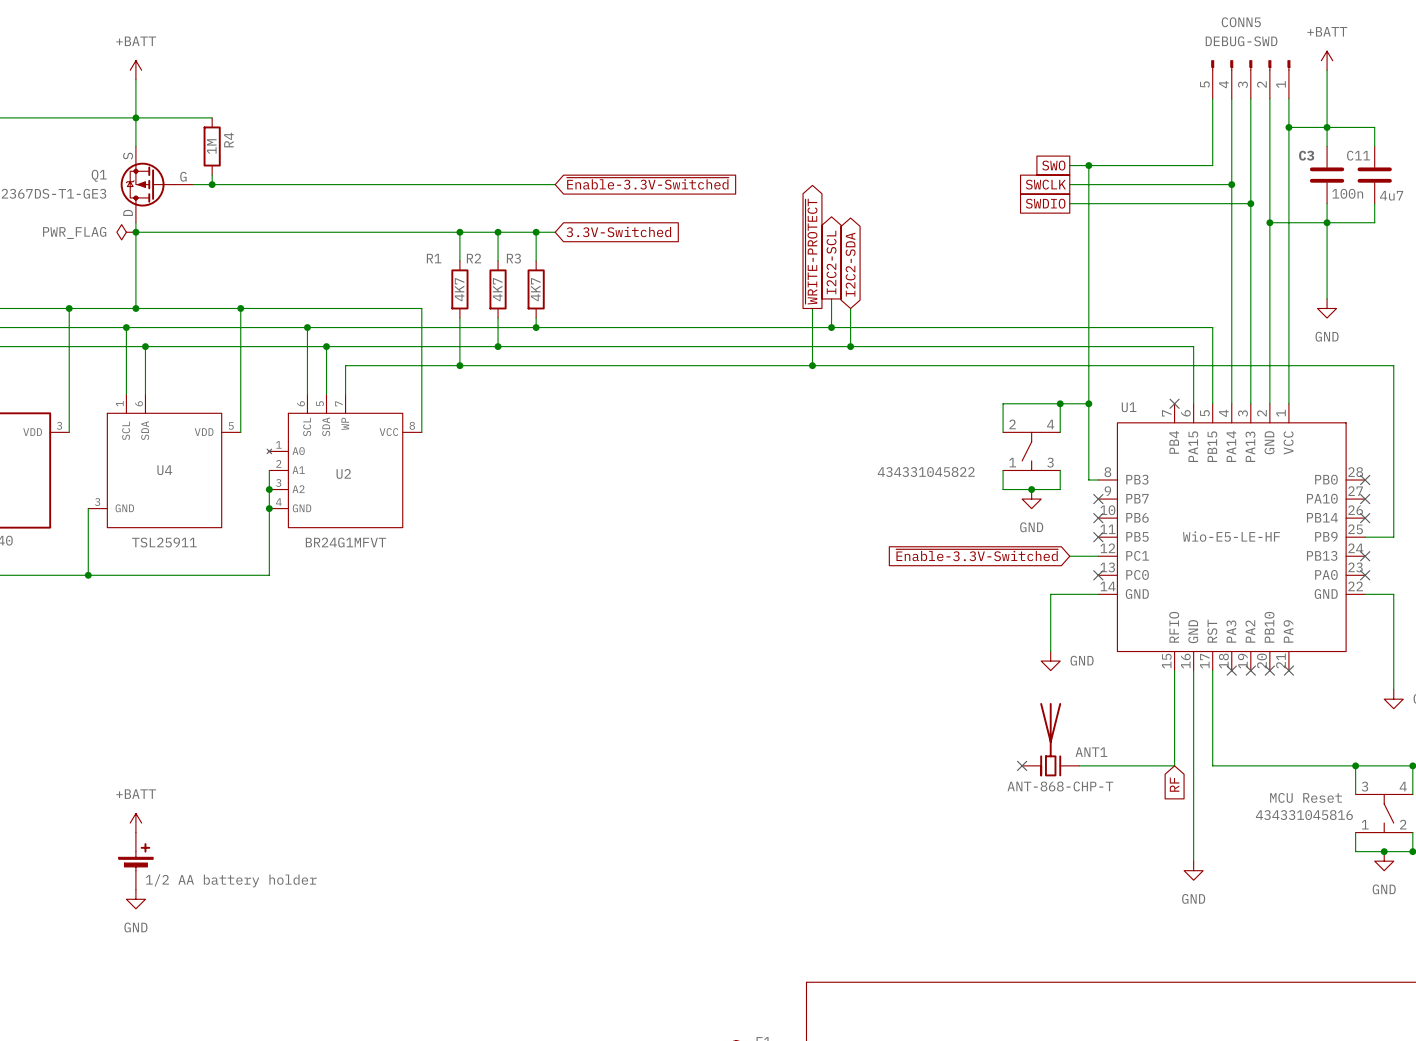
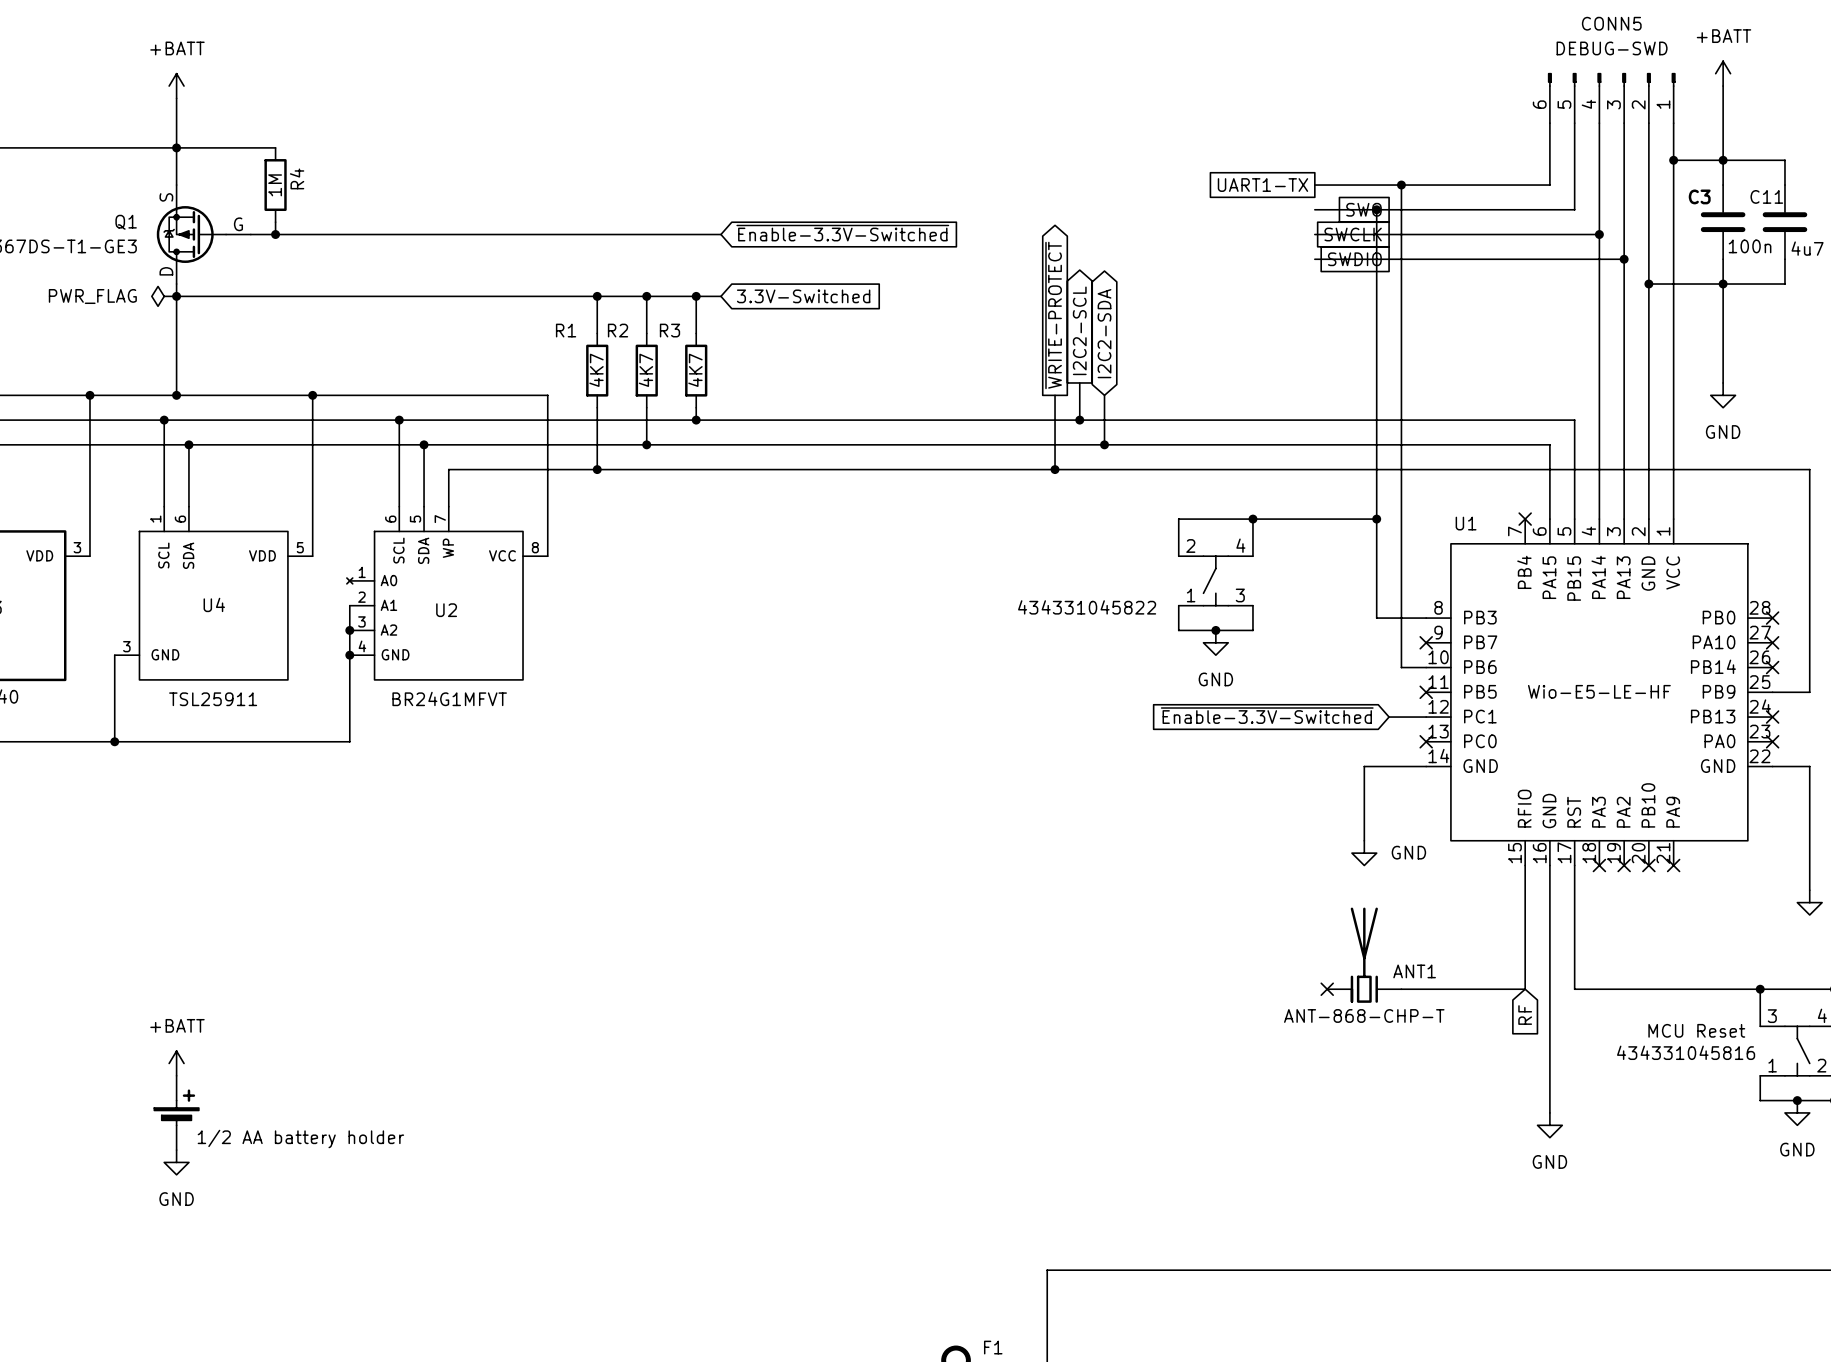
CONN5 symbol: [1211, 60, 1291, 99] -> [1547, 72, 1676, 124]
wire: none -> (1549, 123) (1549, 185) (1314, 185)
global label: none -> UART1-TX (1262, 185)
wire: none -> (1401, 185) (1401, 667) (1426, 667)
junction: none -> (1401, 185)
wire: none -> (1314, 209) (1389, 209)
junction: none -> (1376, 209)
wire: (1088, 165) (1088, 480) -> none
junction: (1088, 165) -> none
wire: none -> (1314, 234) (1389, 234)
wire: none -> (1314, 259) (1389, 259)
wire: none -> (1252, 519) (1252, 556)
junction: none -> (1252, 519)
wire: (1003, 403) (1003, 432) -> (1302, 519) (1178, 519) (1178, 556)
wire: (1060, 403) (1088, 403) -> (1376, 519) (1376, 209)
junction: (1088, 403) -> none
wire: none -> (1376, 556) (1376, 605)
part position: (1031, 451) -> (1215, 580)
wire: none -> (1178, 605) (1178, 630) (1252, 630) (1252, 605)
wire: (1003, 470) (1003, 489) (1060, 489) (1060, 480) -> (1413, 618) (1376, 618)
junction: none -> (1215, 630)
junction: (1031, 489) -> none
power symbol position: GND (1031, 499) -> GND (1215, 642)
no-connect mark: (1098, 518) -> none

